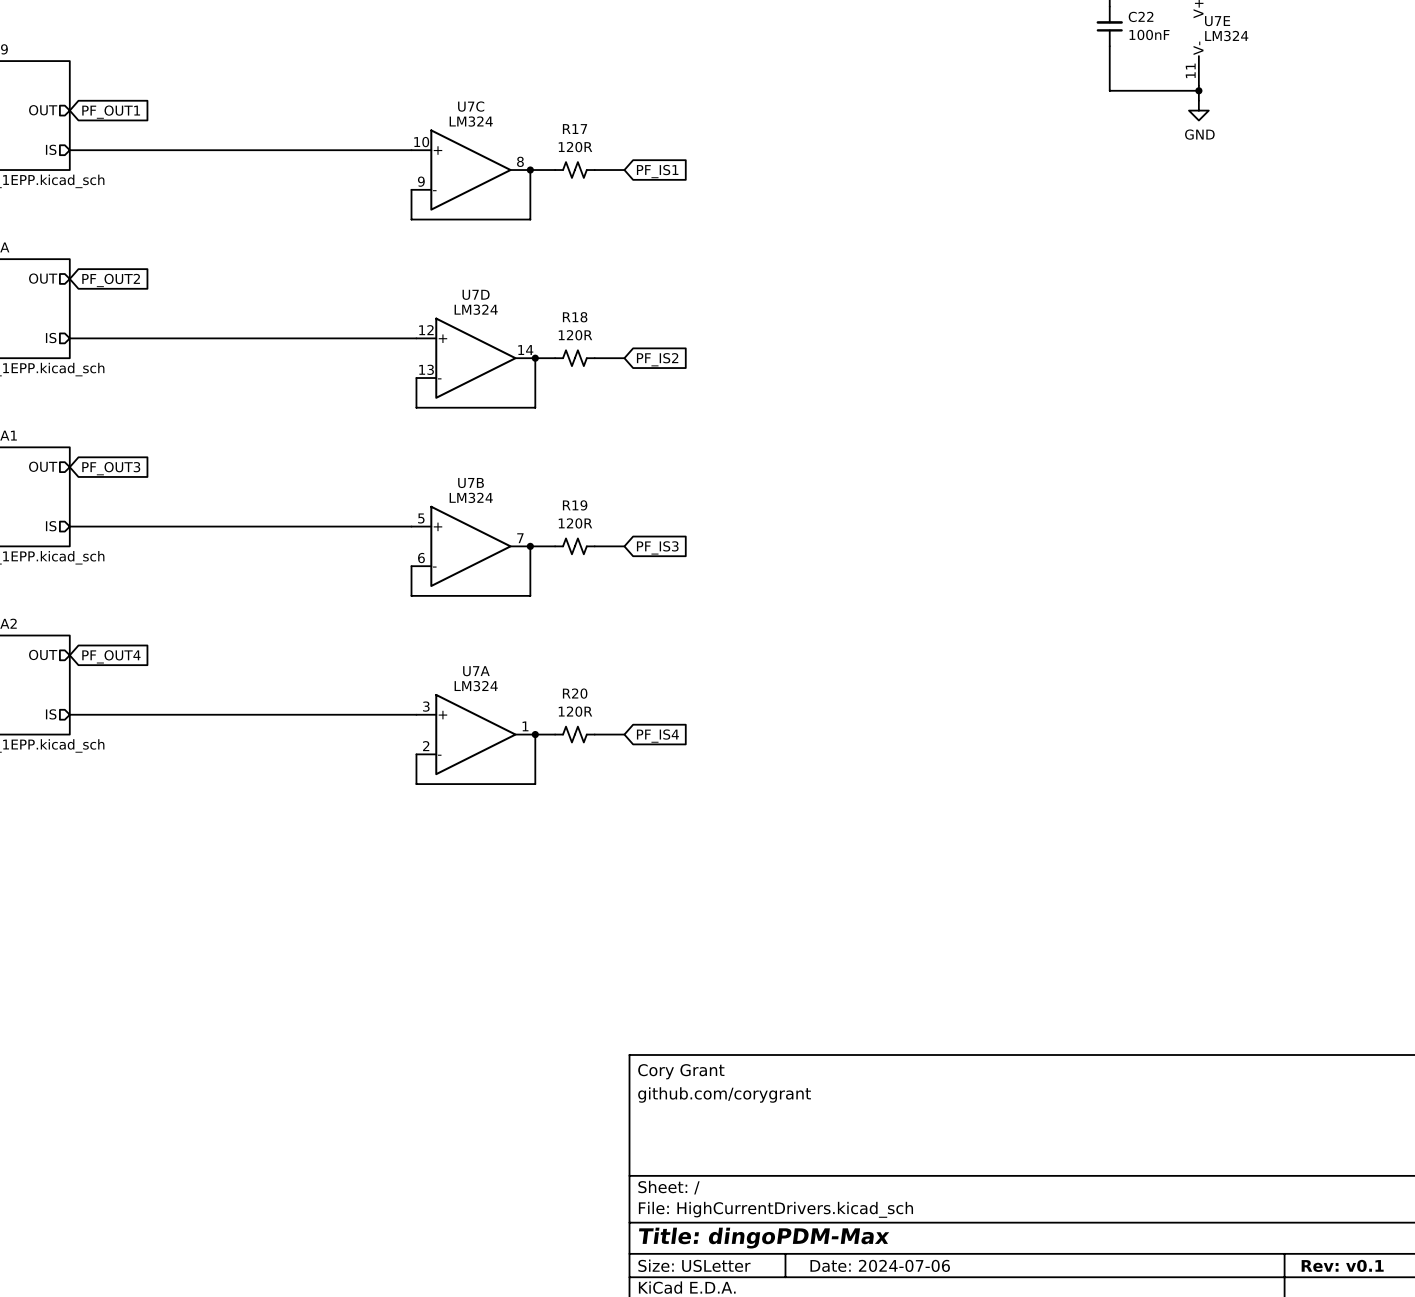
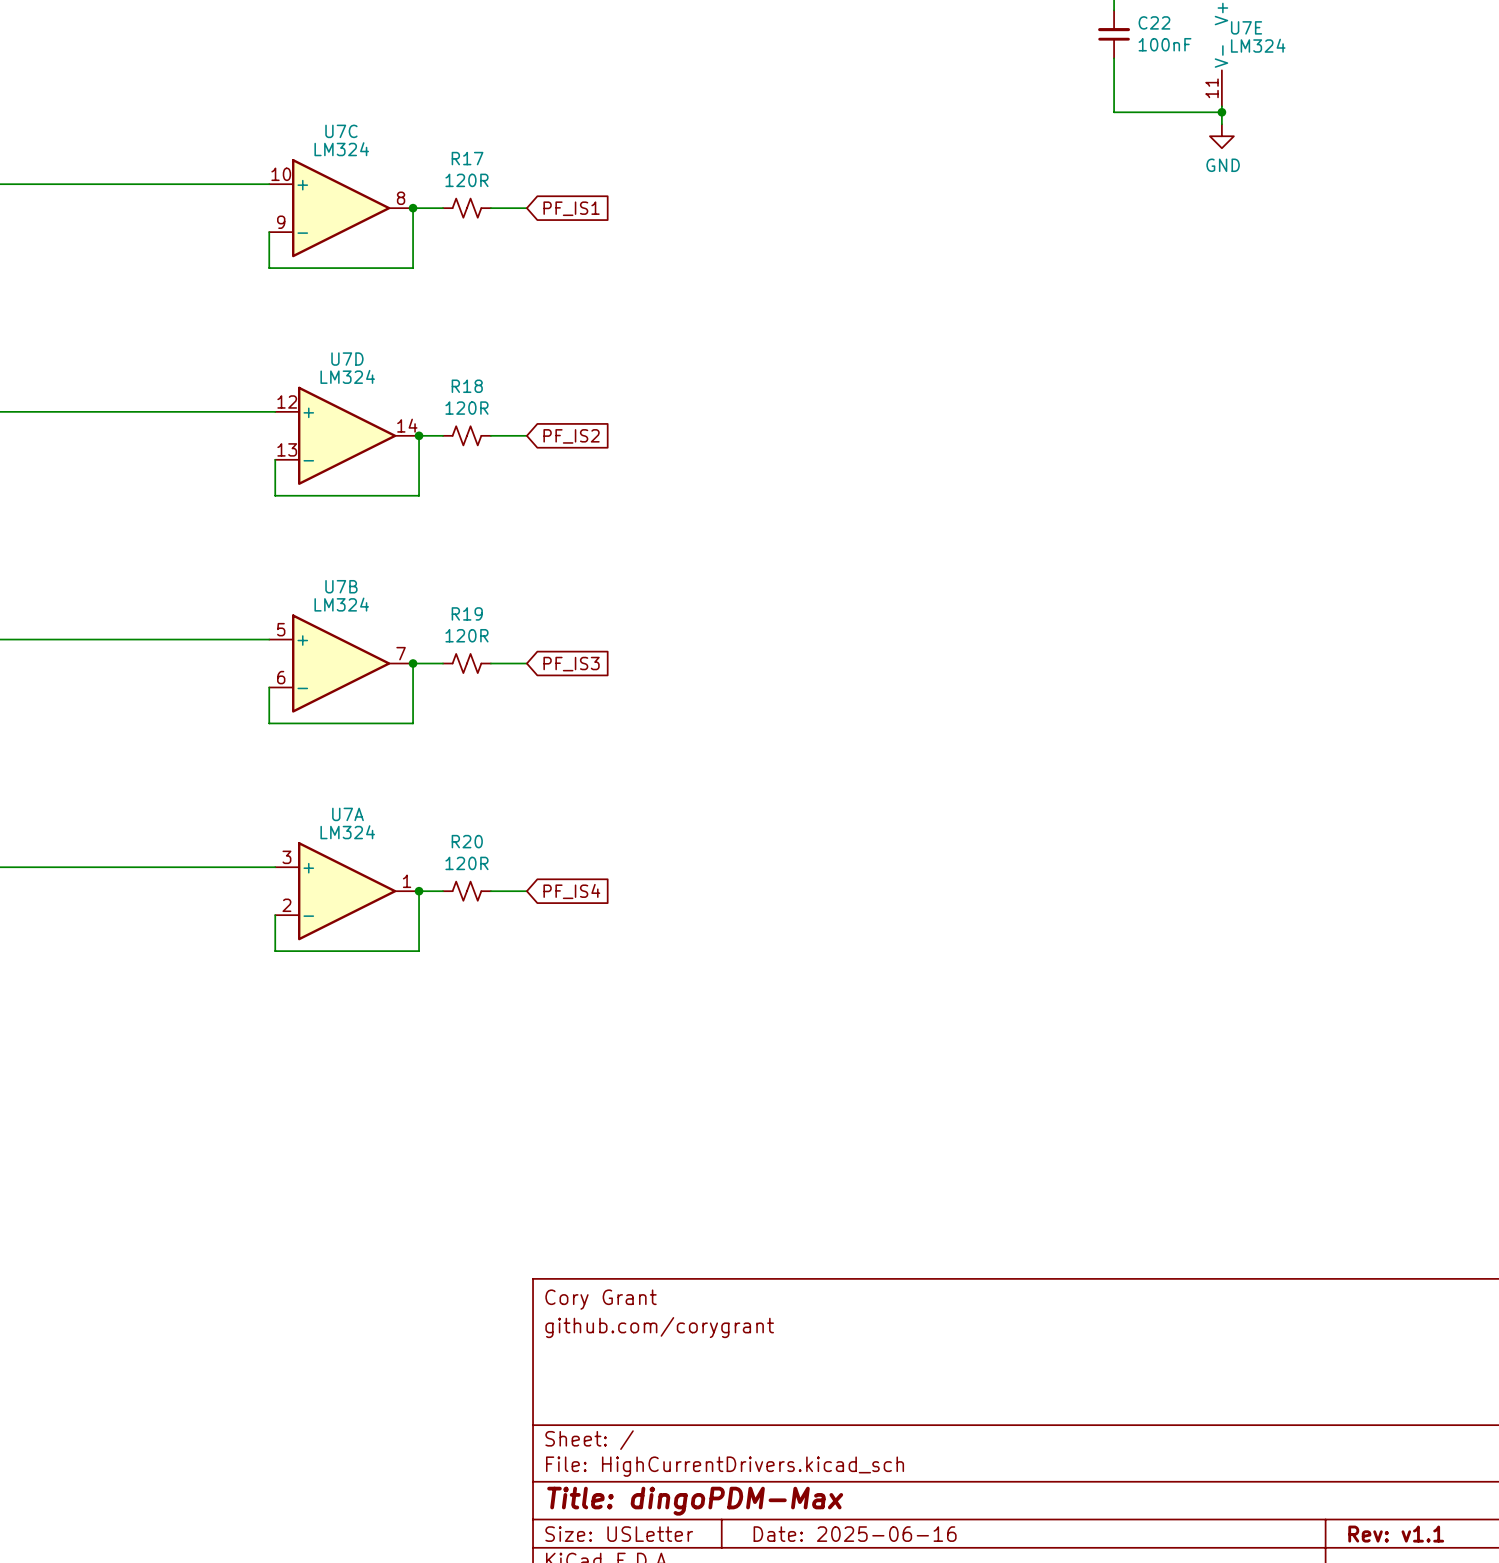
title block: Date: 2024-07-06 (880, 1265) -> Date: 2025-06-16 (855, 1534)
title block: Rev: v0.1 (1342, 1265) -> Rev: v1.1 (1396, 1534)

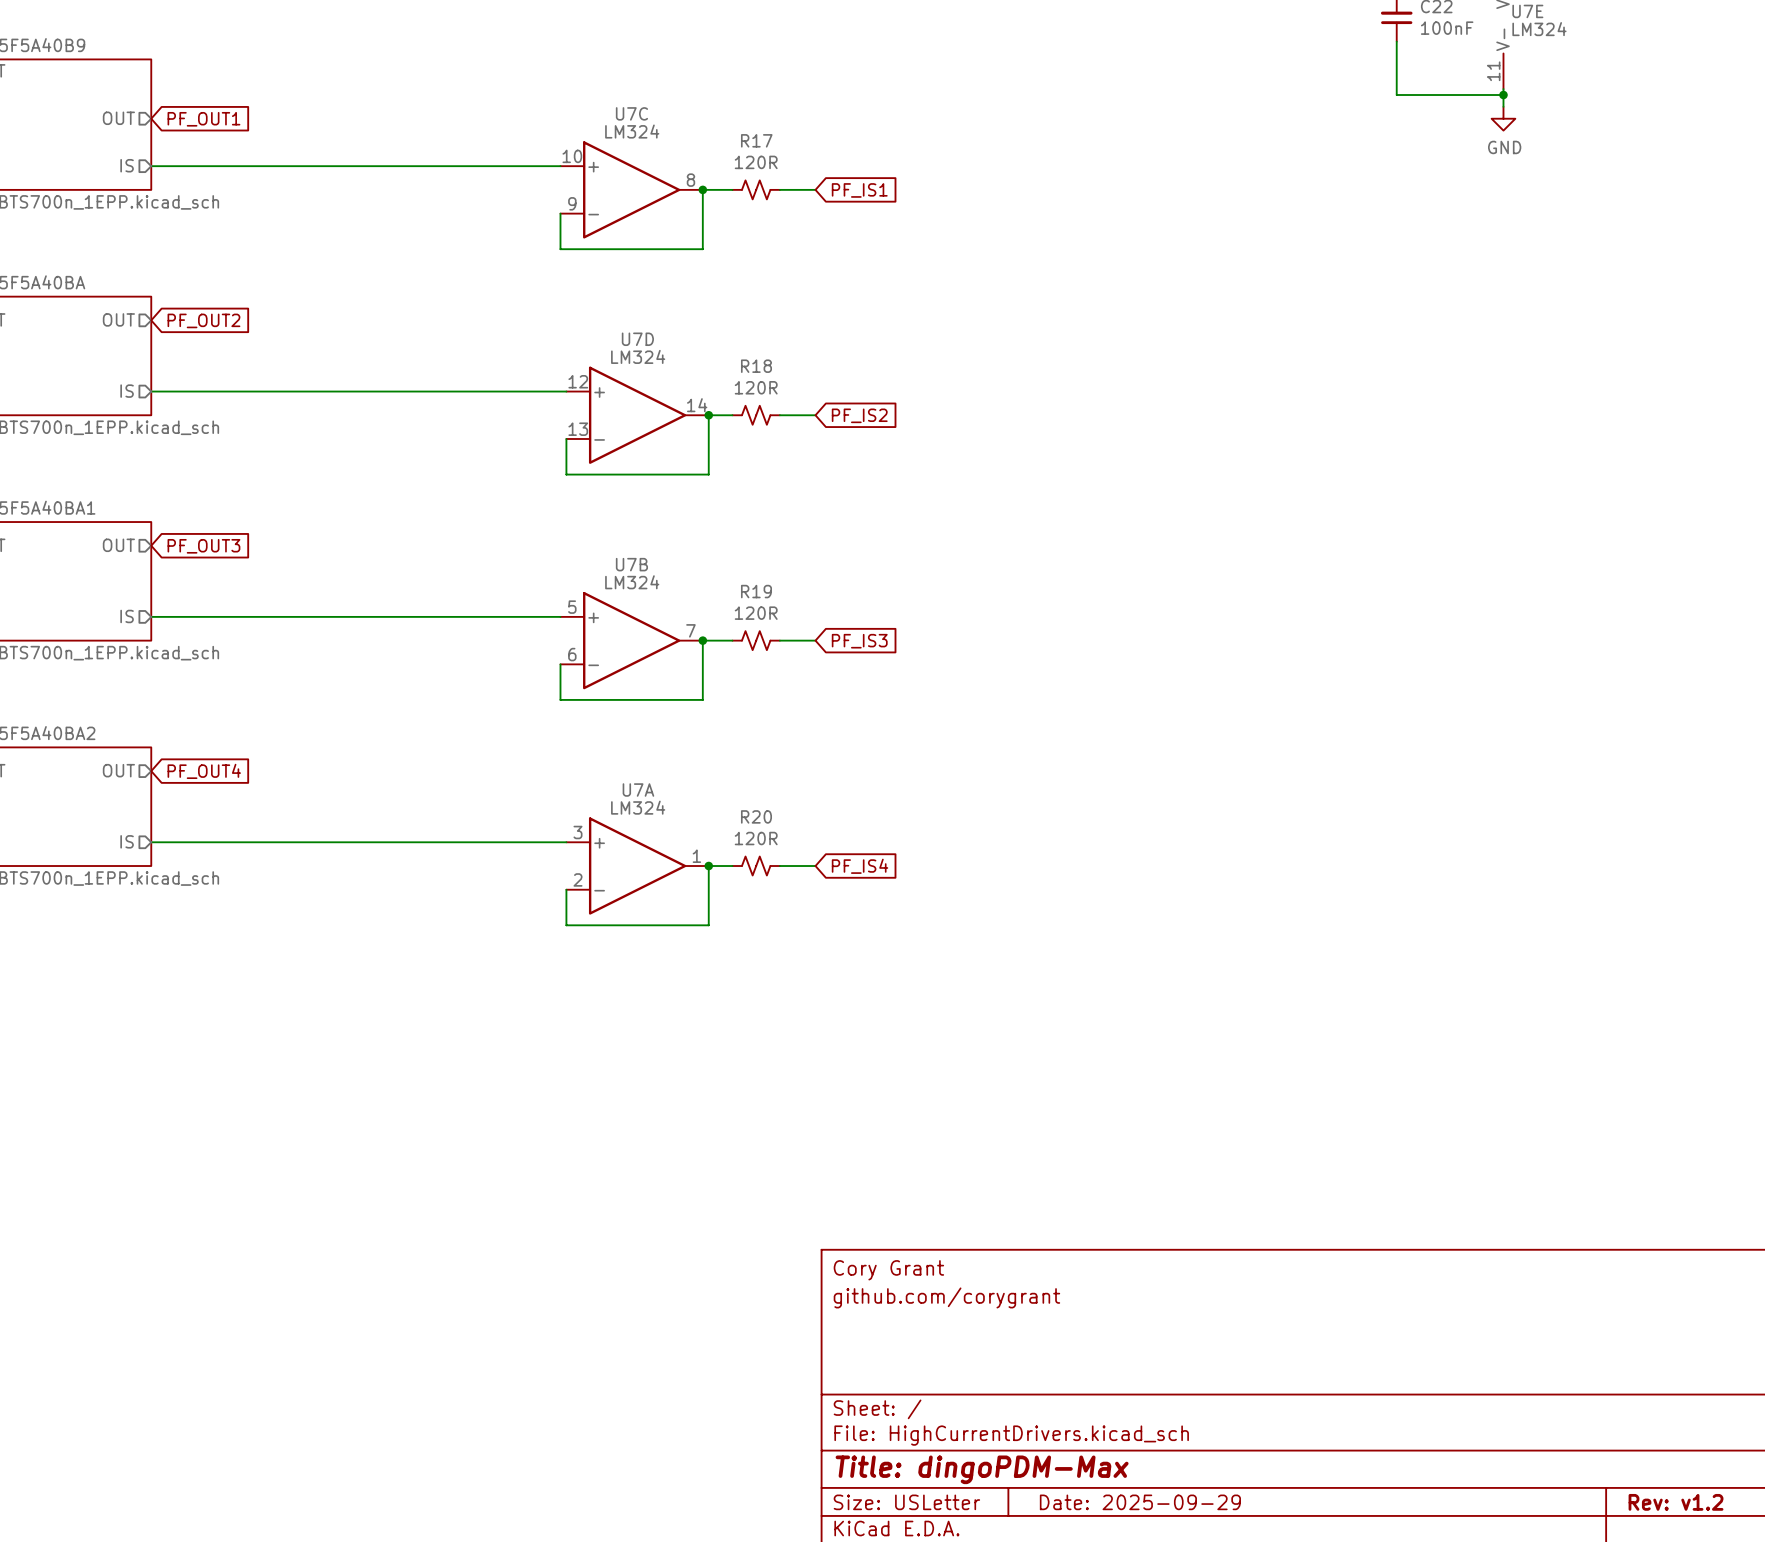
title block: Date: 2025-06-16 (855, 1534) -> Date: 2025-09-29 (1140, 1502)
title block: Rev: v1.1 (1396, 1534) -> Rev: v1.2 (1676, 1502)

